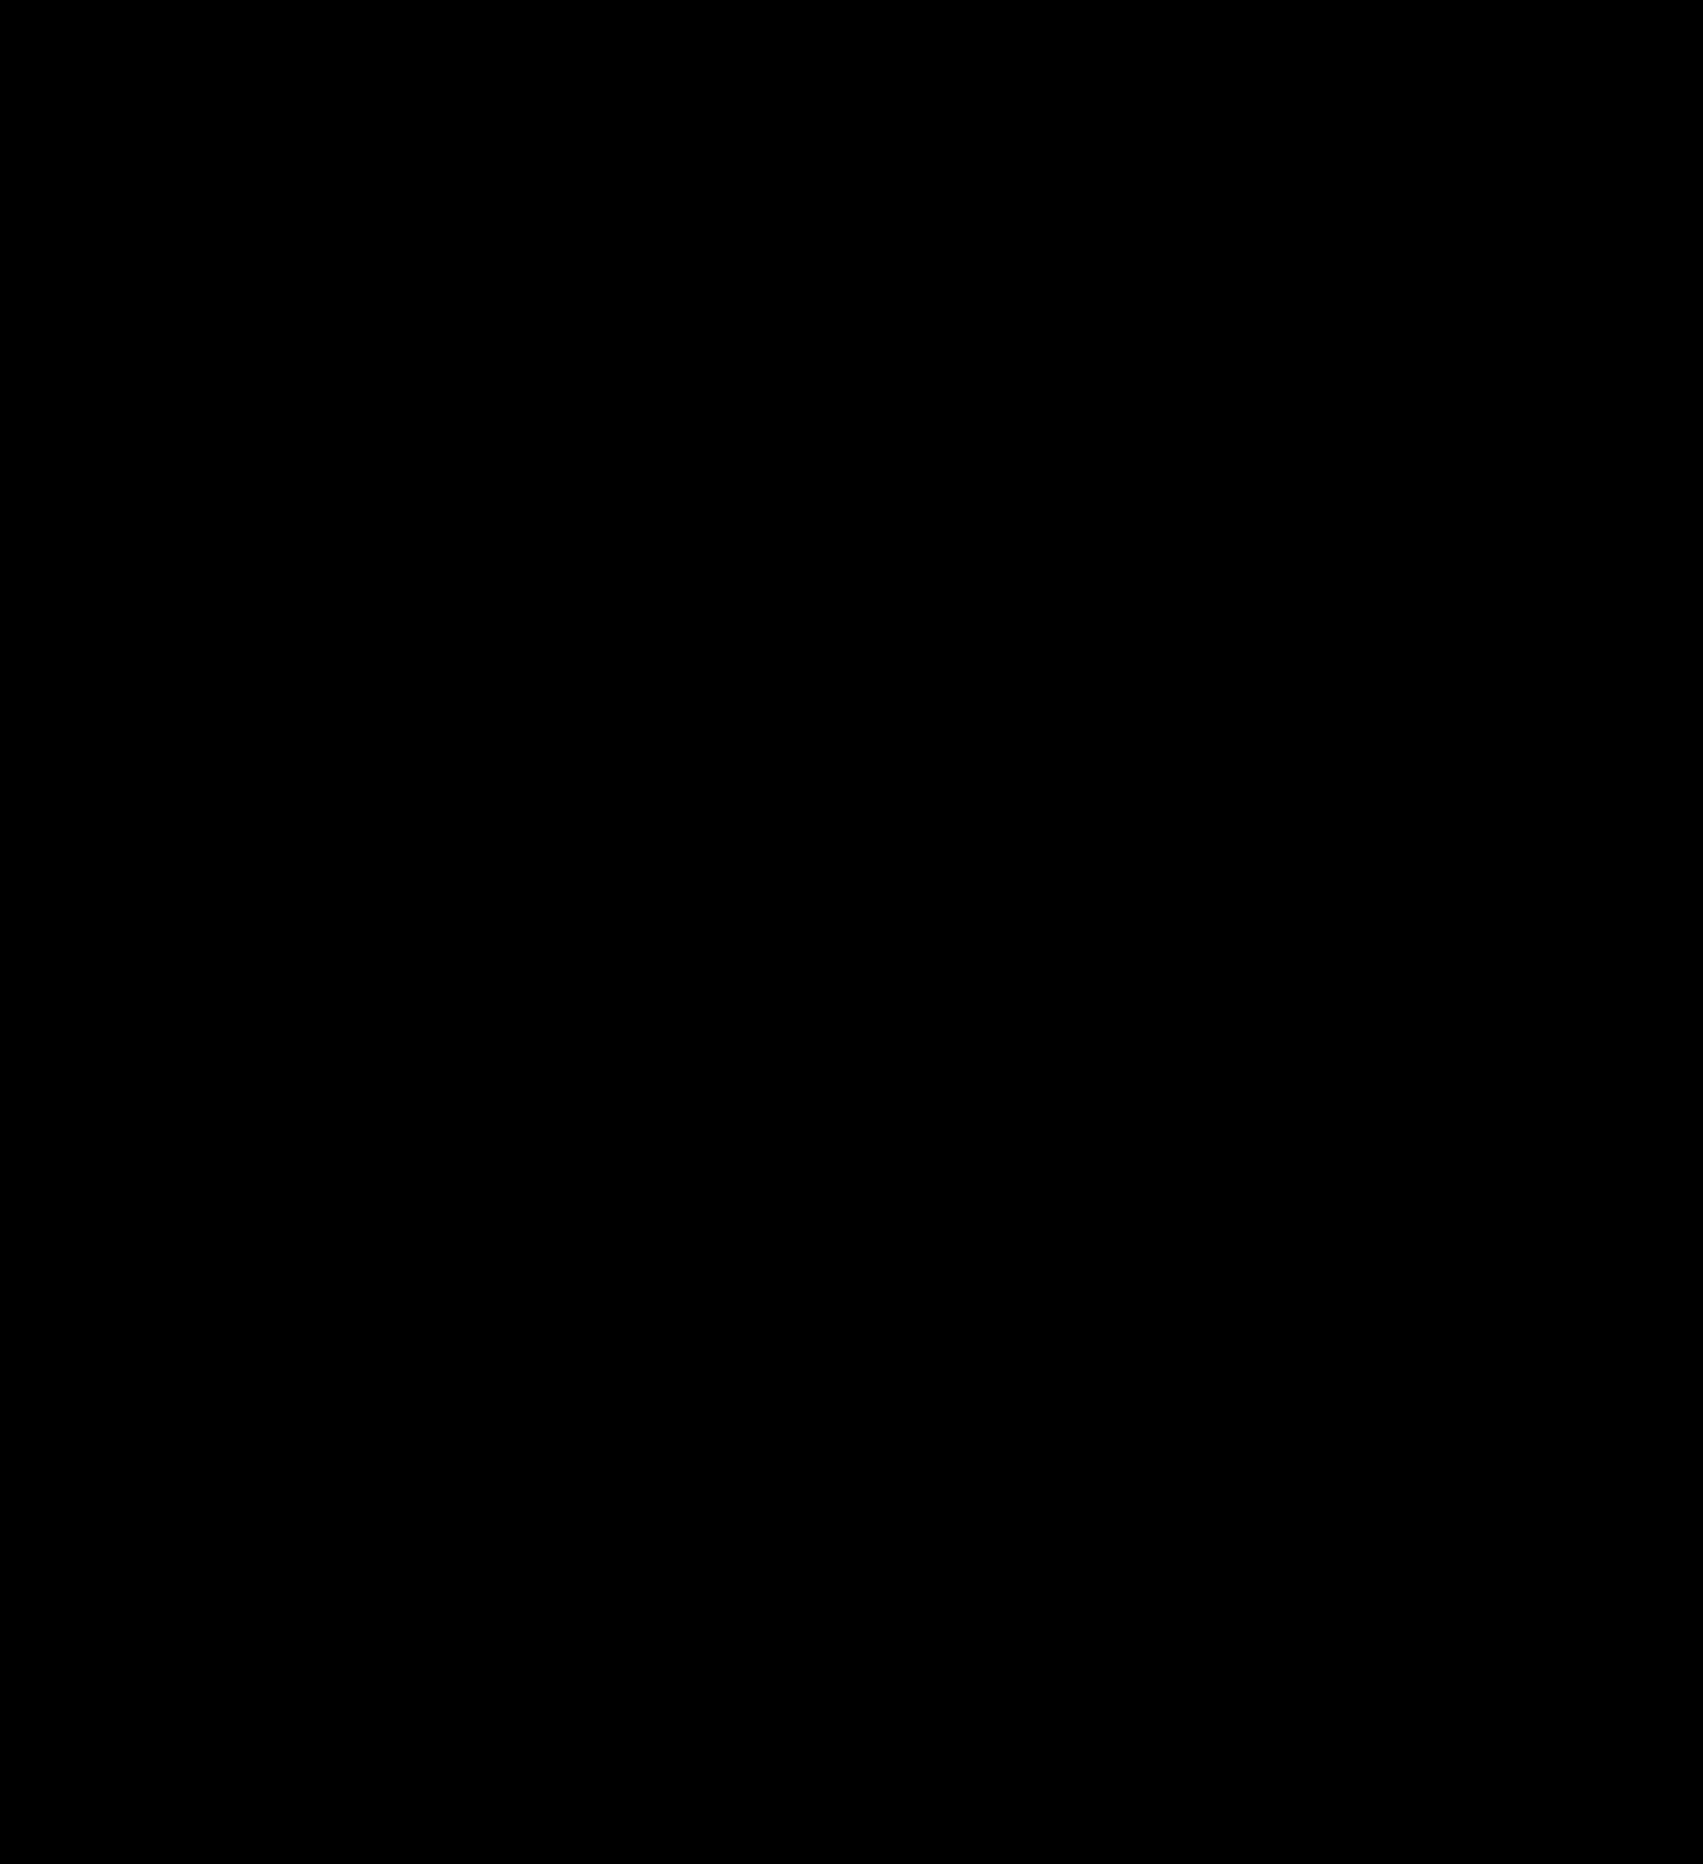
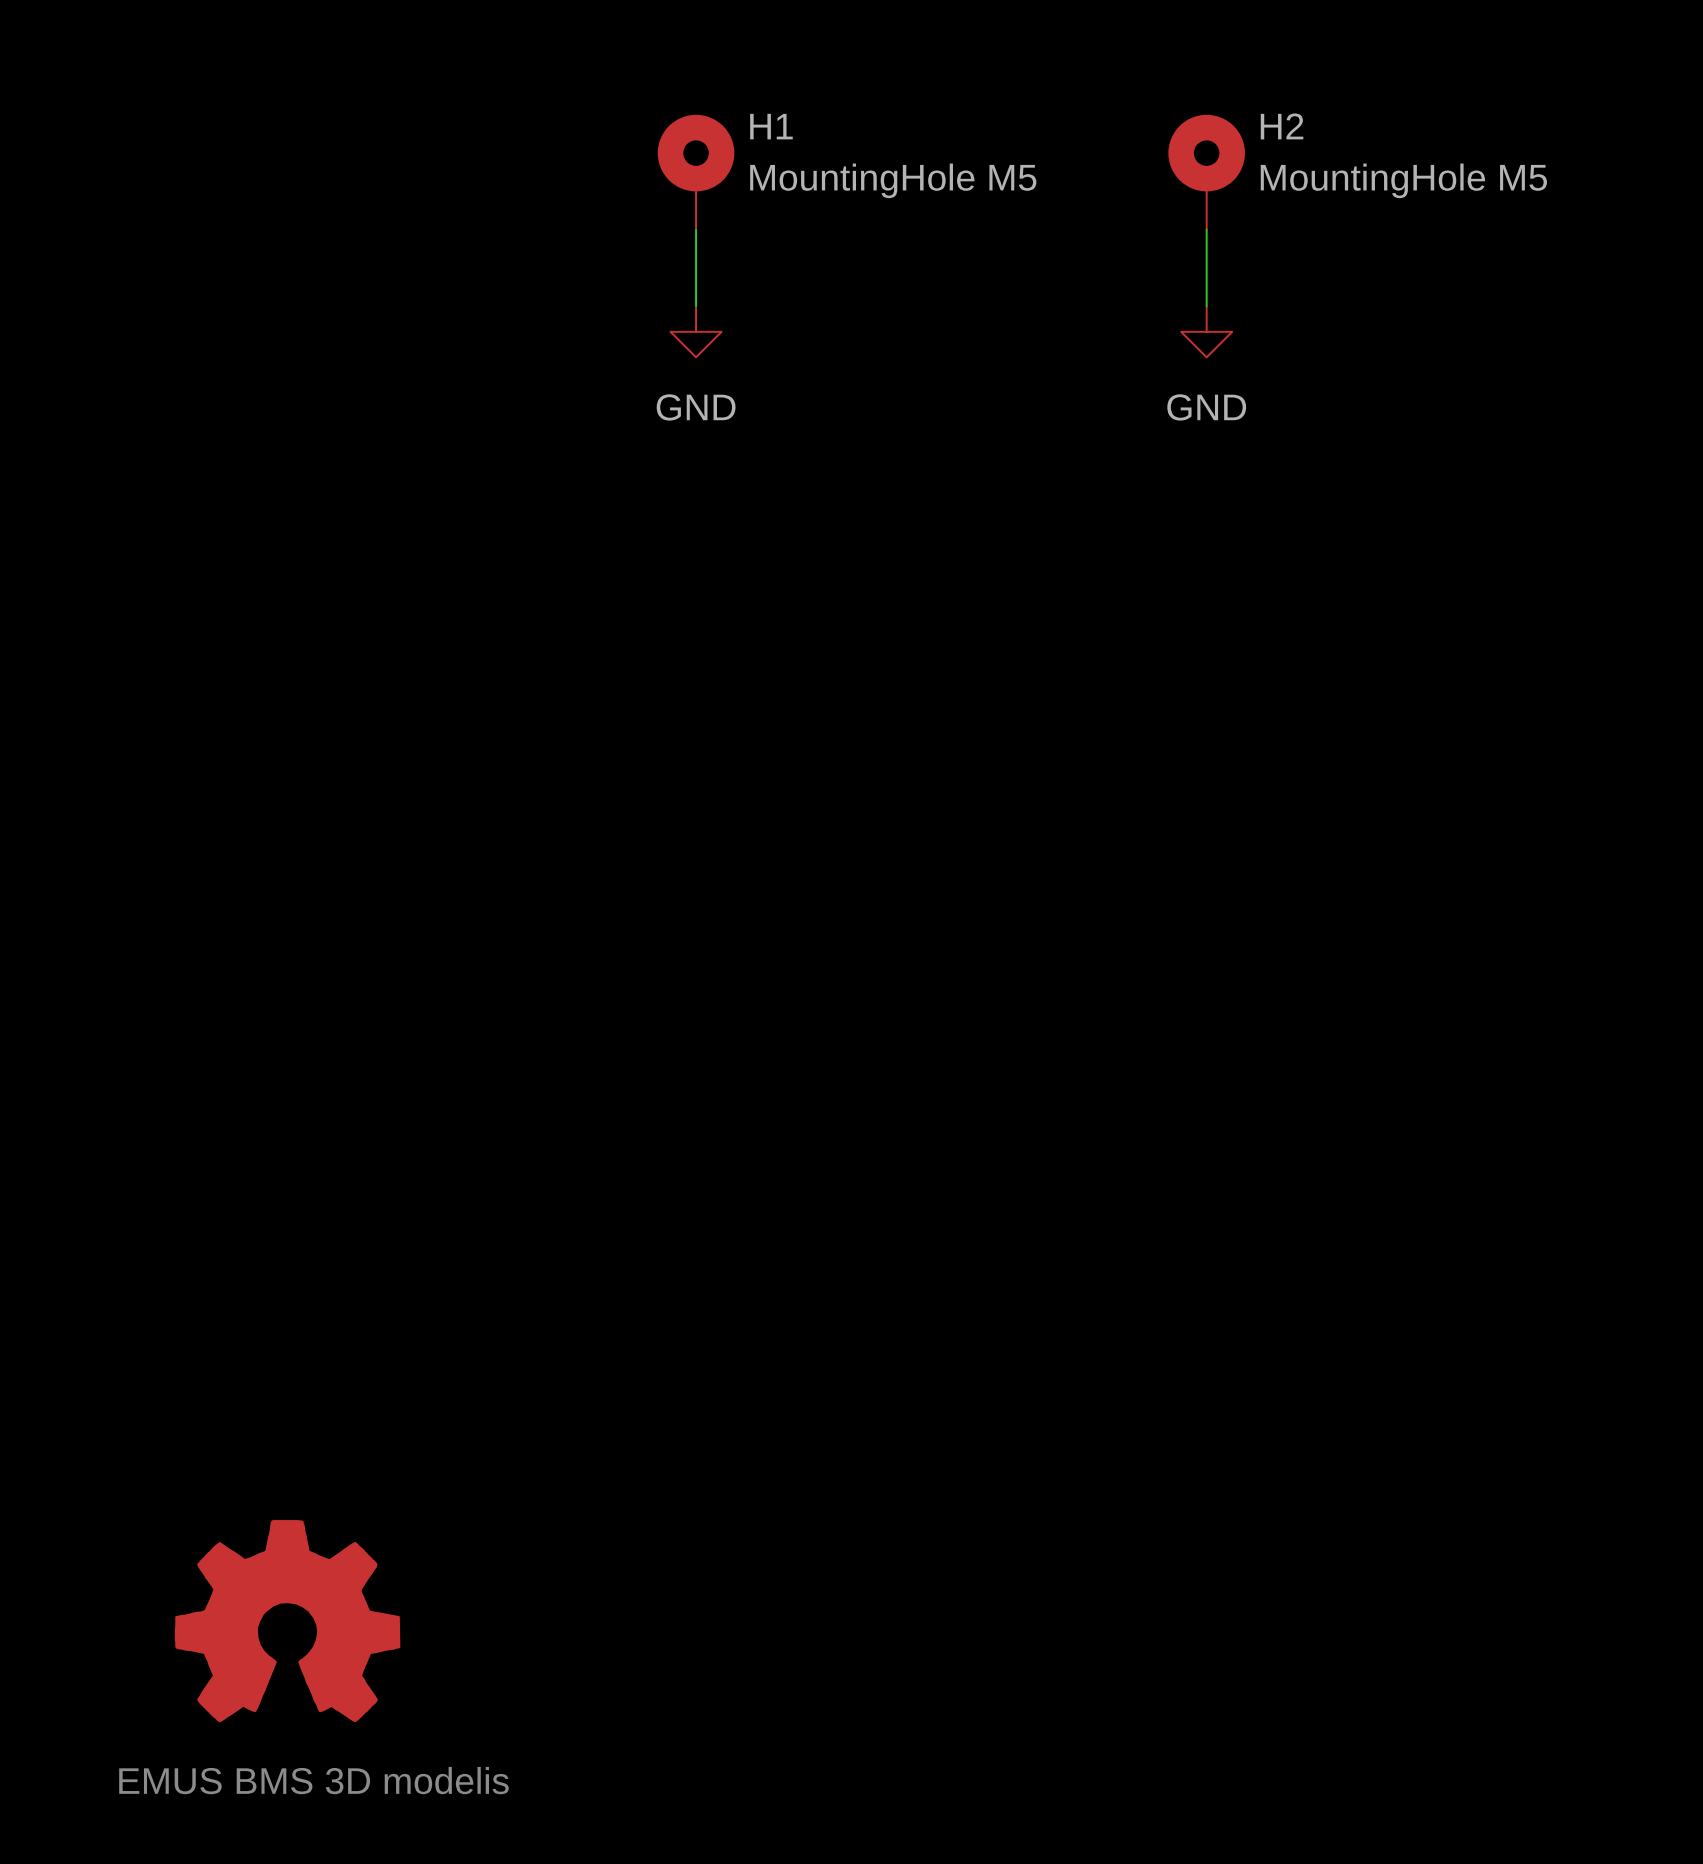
H1: none -> MountingHole M5 (696, 172)
H2: none -> MountingHole M5 (1206, 172)
wire: none -> (696, 229) (696, 306)
wire: none -> (1206, 229) (1206, 306)
power symbol: none -> GND (696, 331)
power symbol: none -> GND (1206, 331)
part: none -> (287, 1621)
text: none -> EMUS BMS 3D modelis (313, 1780)

